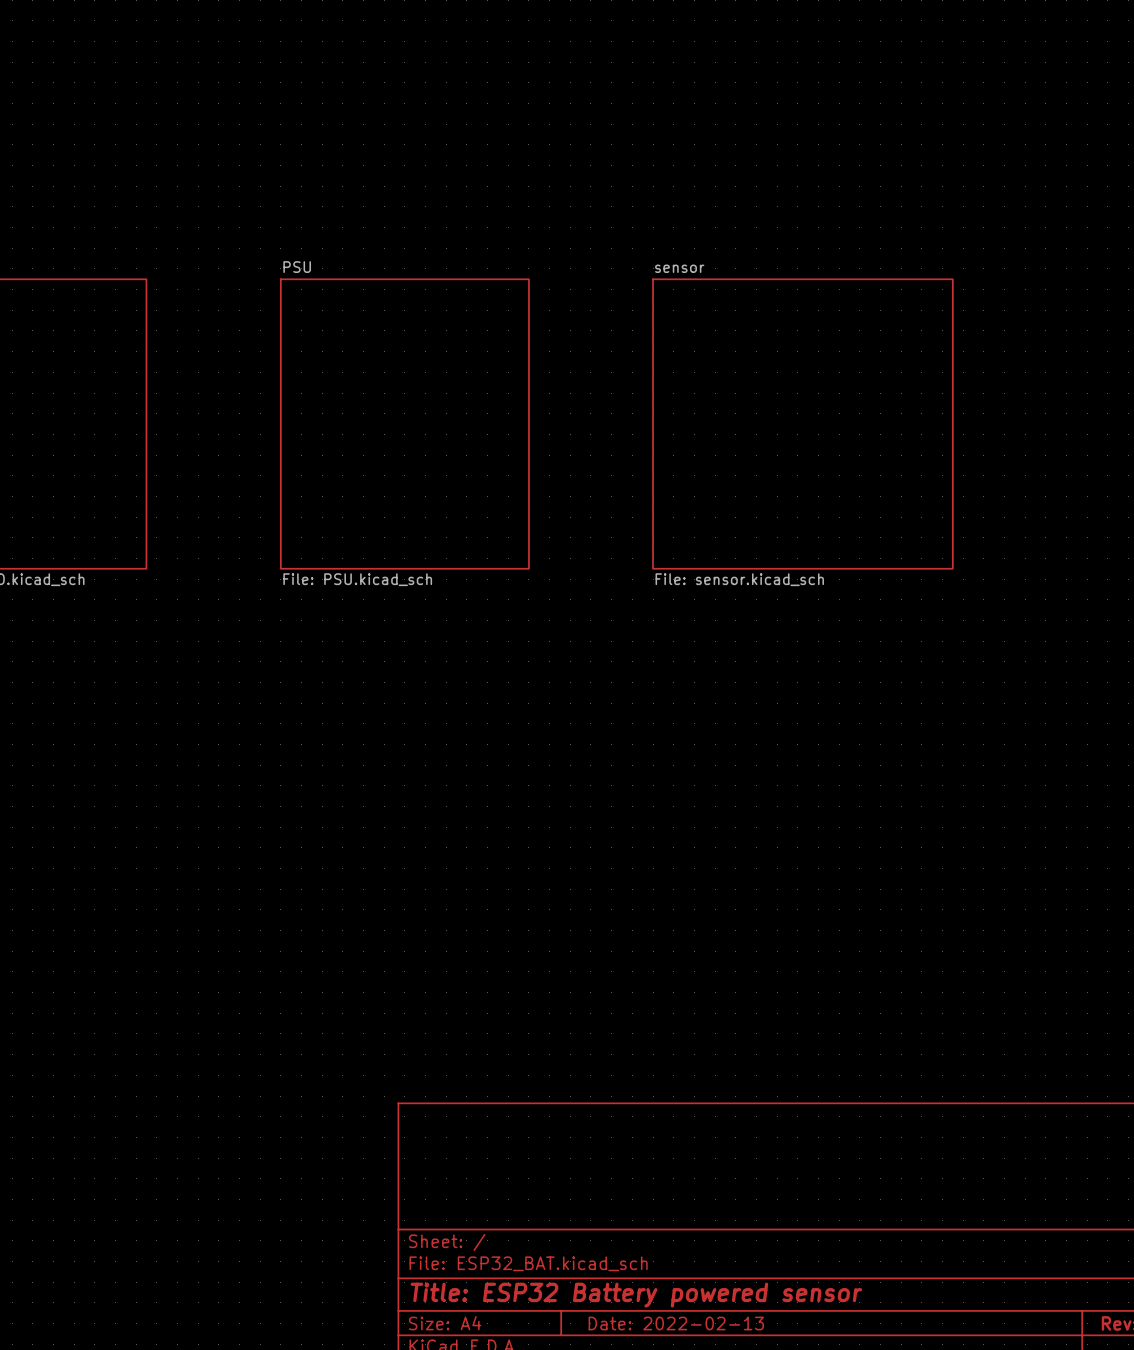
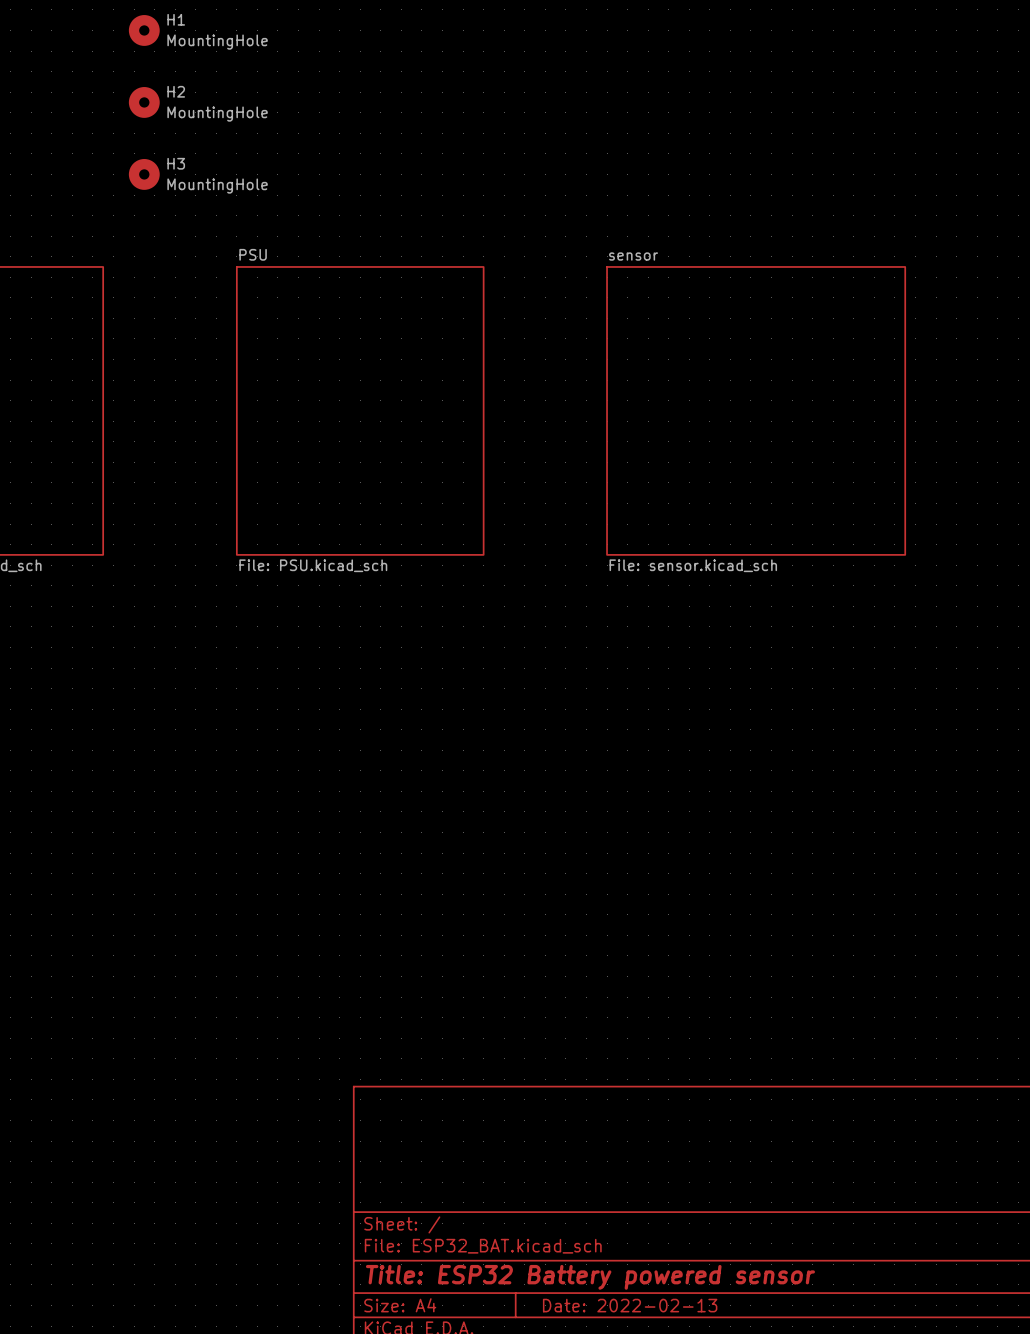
H1: none -> MountingHole (144, 30)
H2: none -> MountingHole (144, 102)
H3: none -> MountingHole (144, 174)

